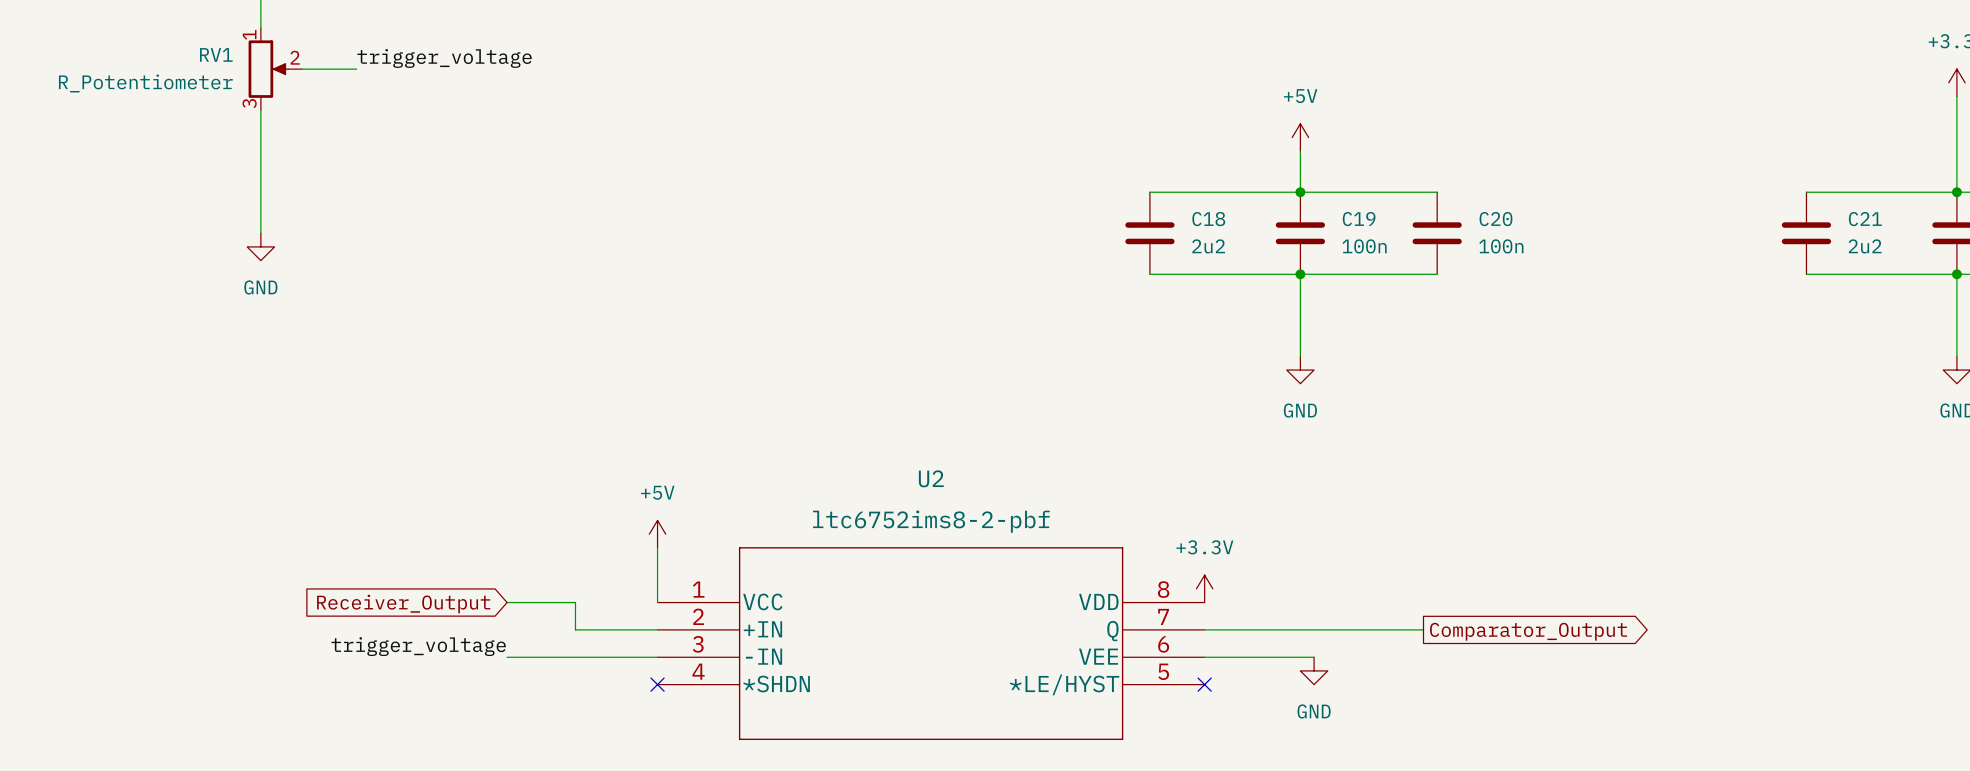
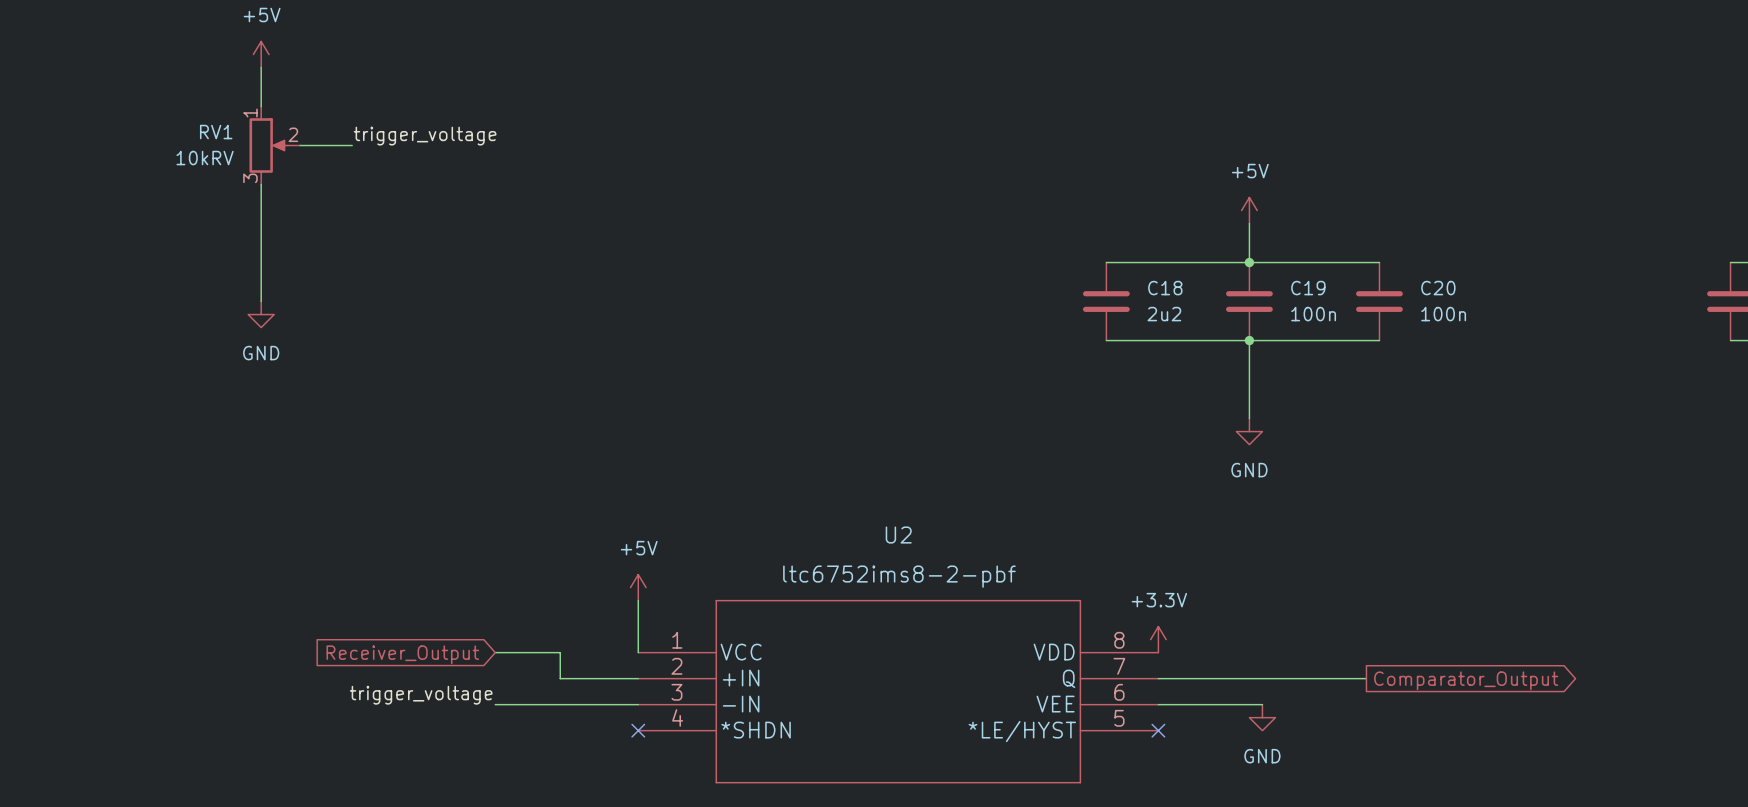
RV1 value: R_Potentiometer (145, 83) -> 10kRV (205, 158)

